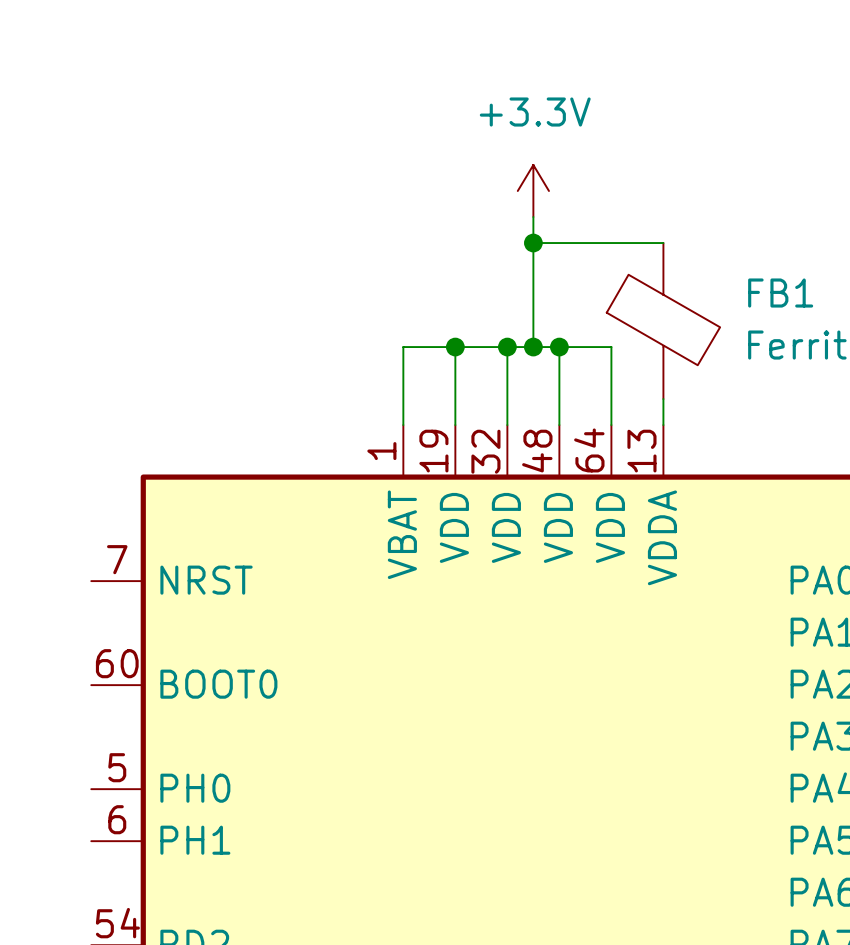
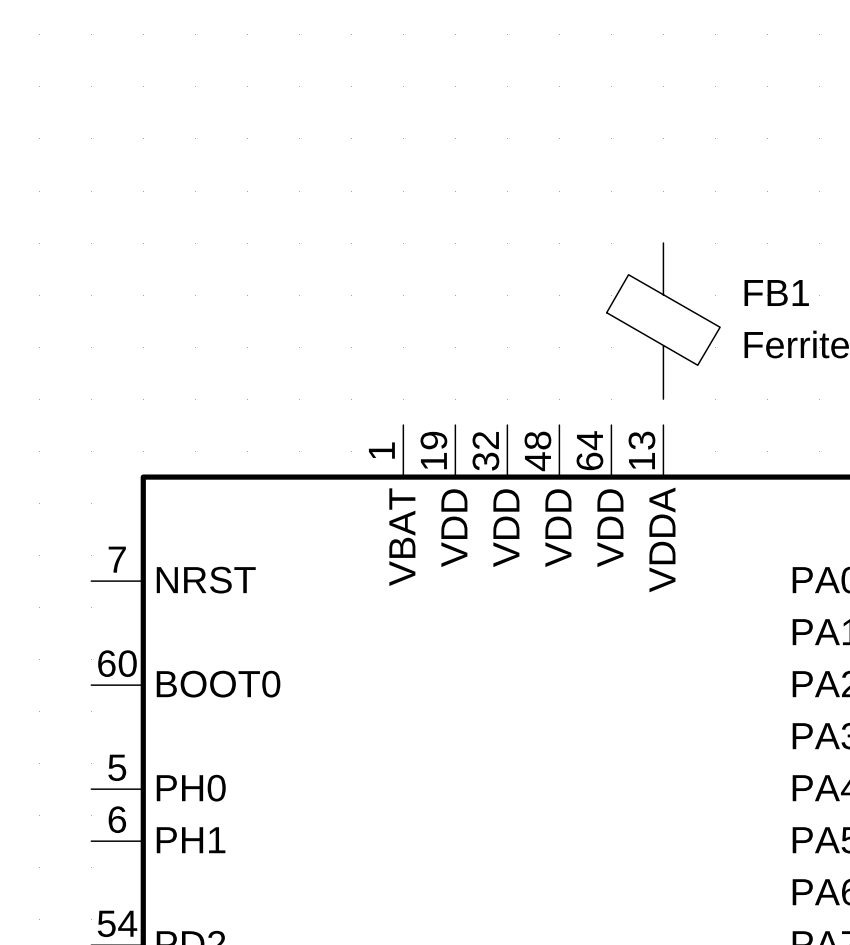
power symbol: +3.3V (533, 191) -> none
wire: (533, 217) (533, 347) -> none
wire: (533, 243) (663, 243) -> none
junction: (533, 243) -> none
wire: (455, 347) (455, 425) -> none
junction: (455, 347) -> none
wire: (507, 347) (507, 425) -> none
junction: (507, 347) -> none
junction: (533, 347) -> none
wire: (559, 347) (559, 425) -> none
junction: (559, 347) -> none
wire: (663, 399) (663, 425) -> none
wire: (403, 425) (403, 347) (611, 347) (611, 425) -> none

